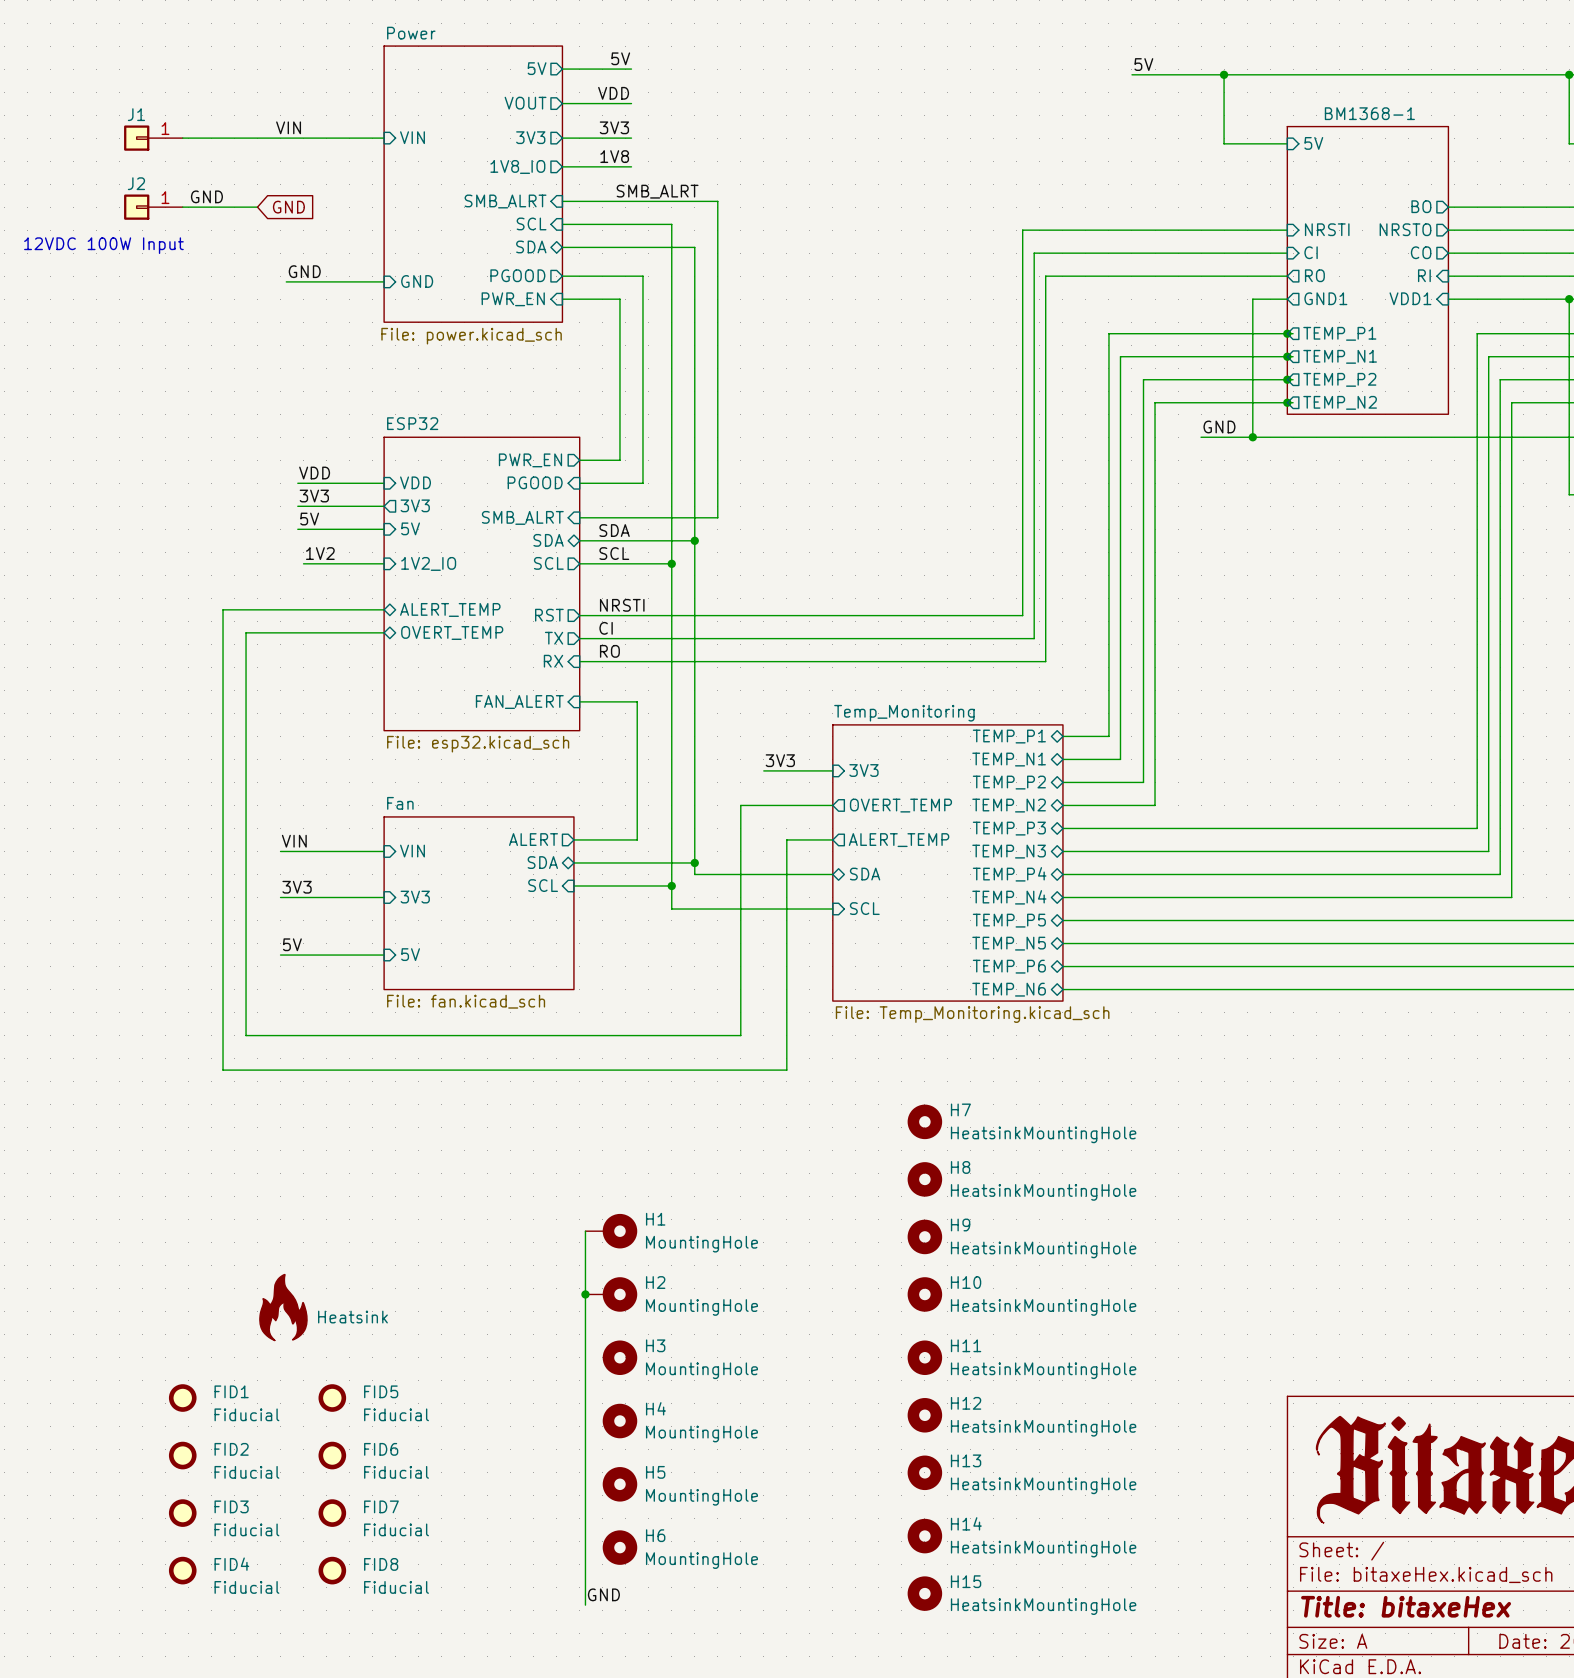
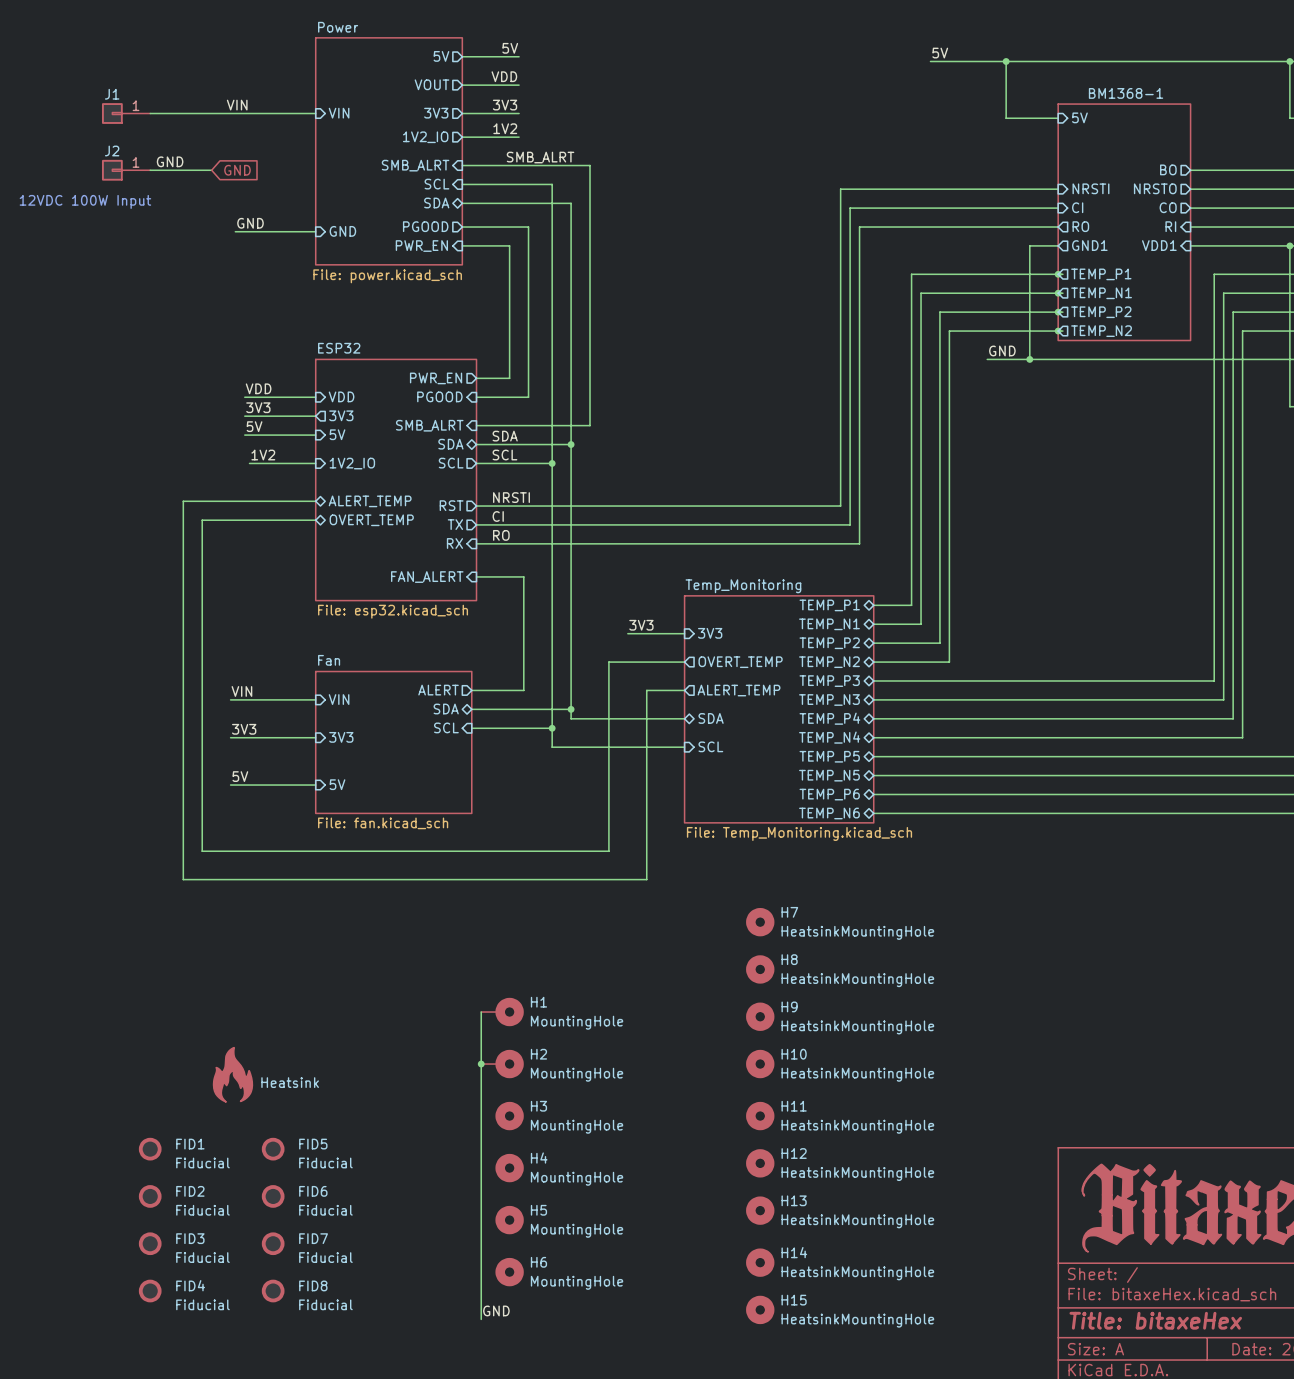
label: 1V8 (614, 156) -> 1V2 (505, 128)
sheet pin: 1V8_IO (517, 166) -> 1V2_IO (425, 137)

